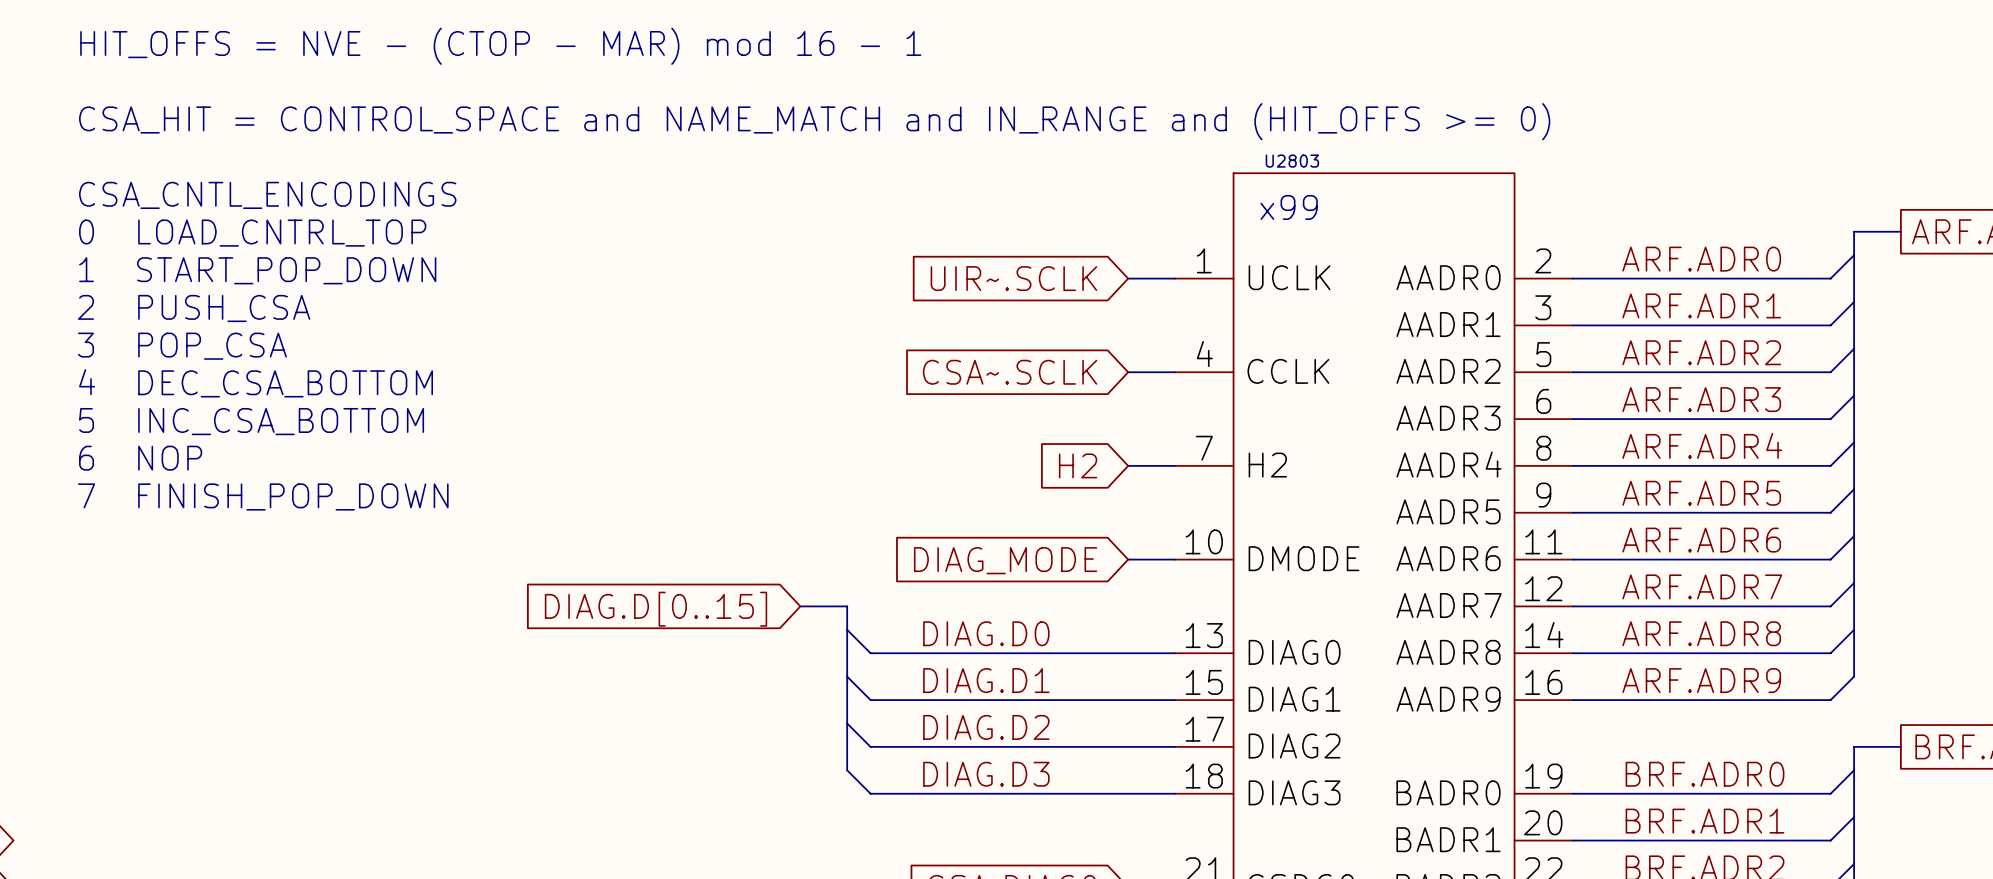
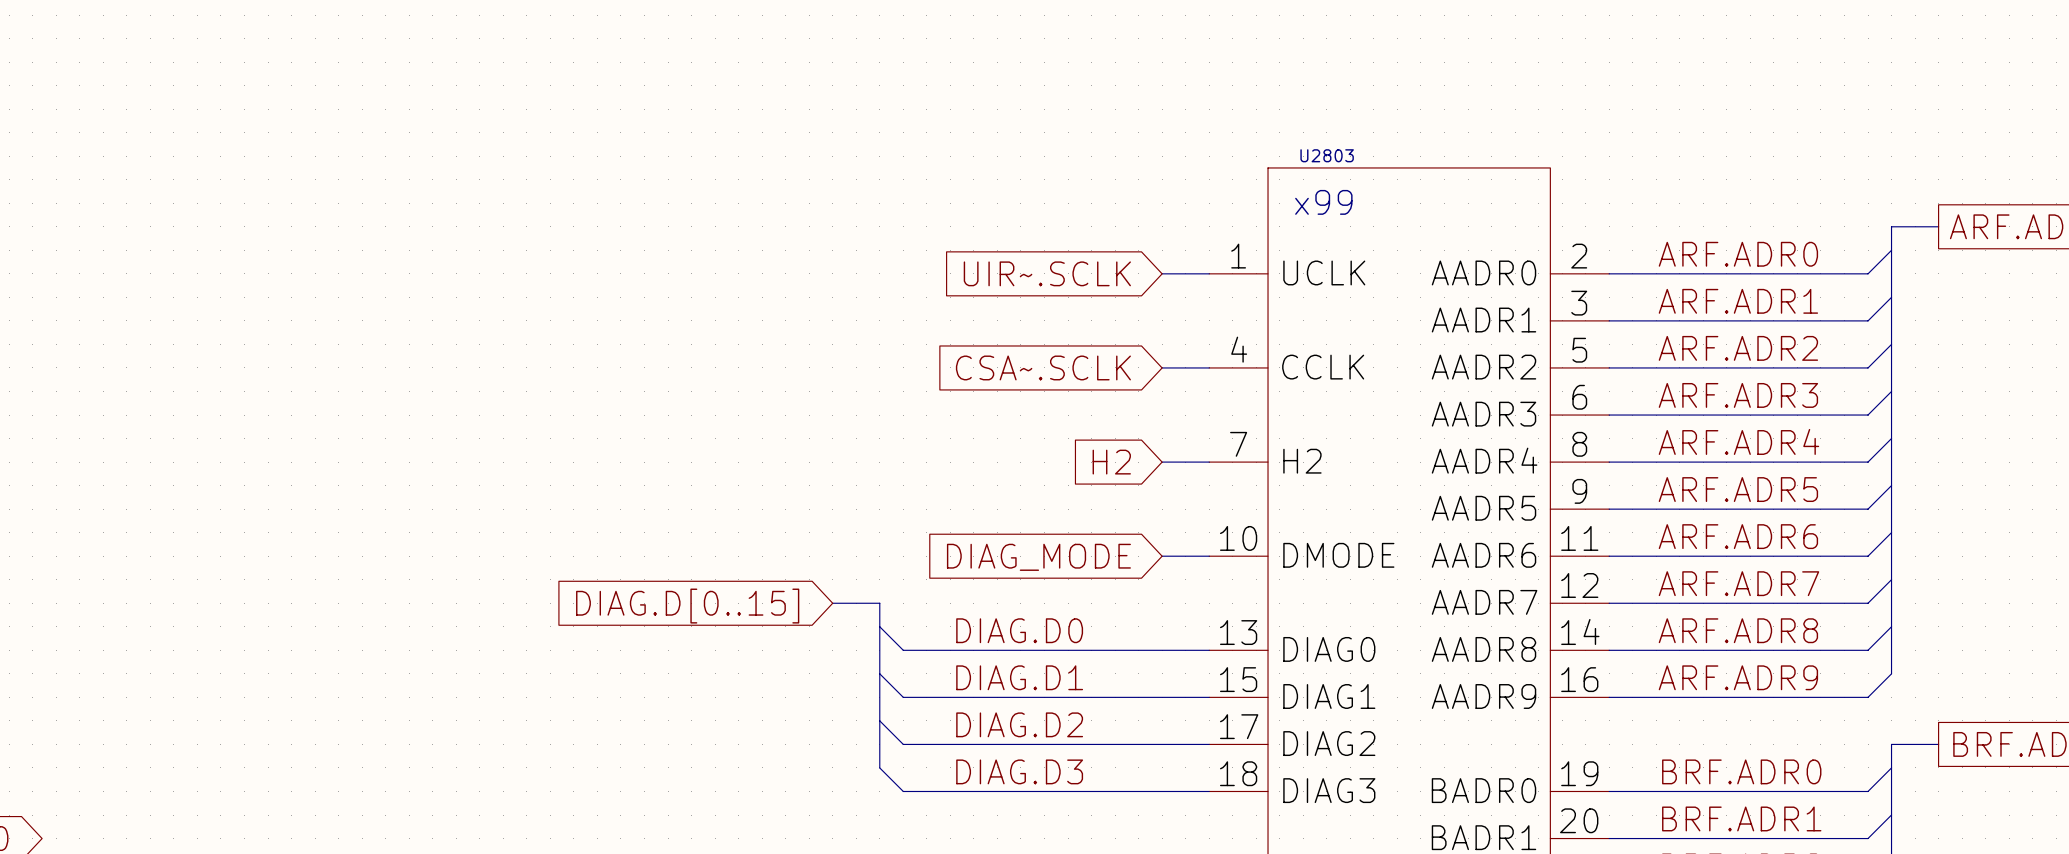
text: HIT_OFFS = NVE - (CTOP - MAR) mod 16 - 1 (500, 46) -> none
text: CSA_HIT = CONTROL_SPACE and NAME_MATCH and IN_RANGE and (HIT_OFFS >= 0) (814, 121) -> none
text: CSA_CNTL_ENCODINGS (267, 195) -> none
text: 0 LOAD_CNTRL_TOP (252, 233) -> none
text: 1 START_POP_DOWN (257, 270) -> none
text: 2 PUSH_CSA (194, 308) -> none
text: 3 POP_CSA (182, 346) -> none
text: 4 DEC_CSA_BOTTOM (256, 383) -> none
text: 5 INC_CSA_BOTTOM (251, 421) -> none
text: 6 NOP (140, 458) -> none
text: 7 FINISH_POP_DOWN (263, 496) -> none

